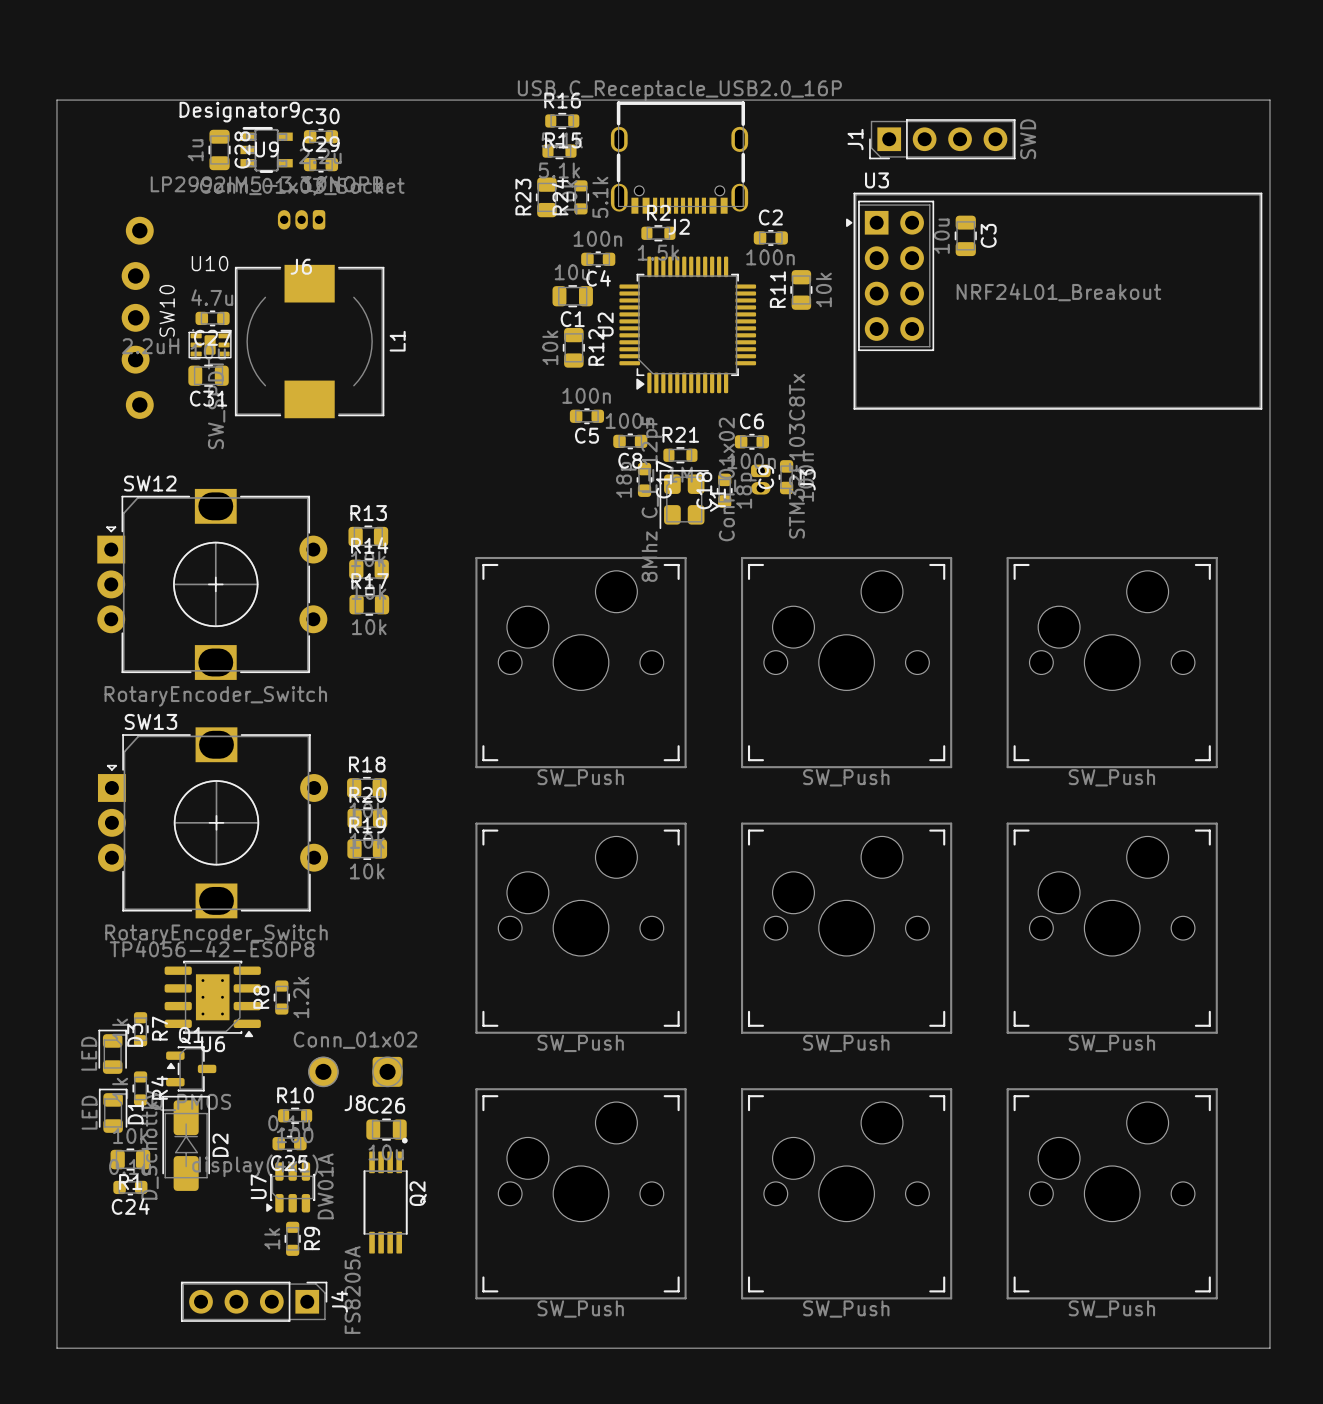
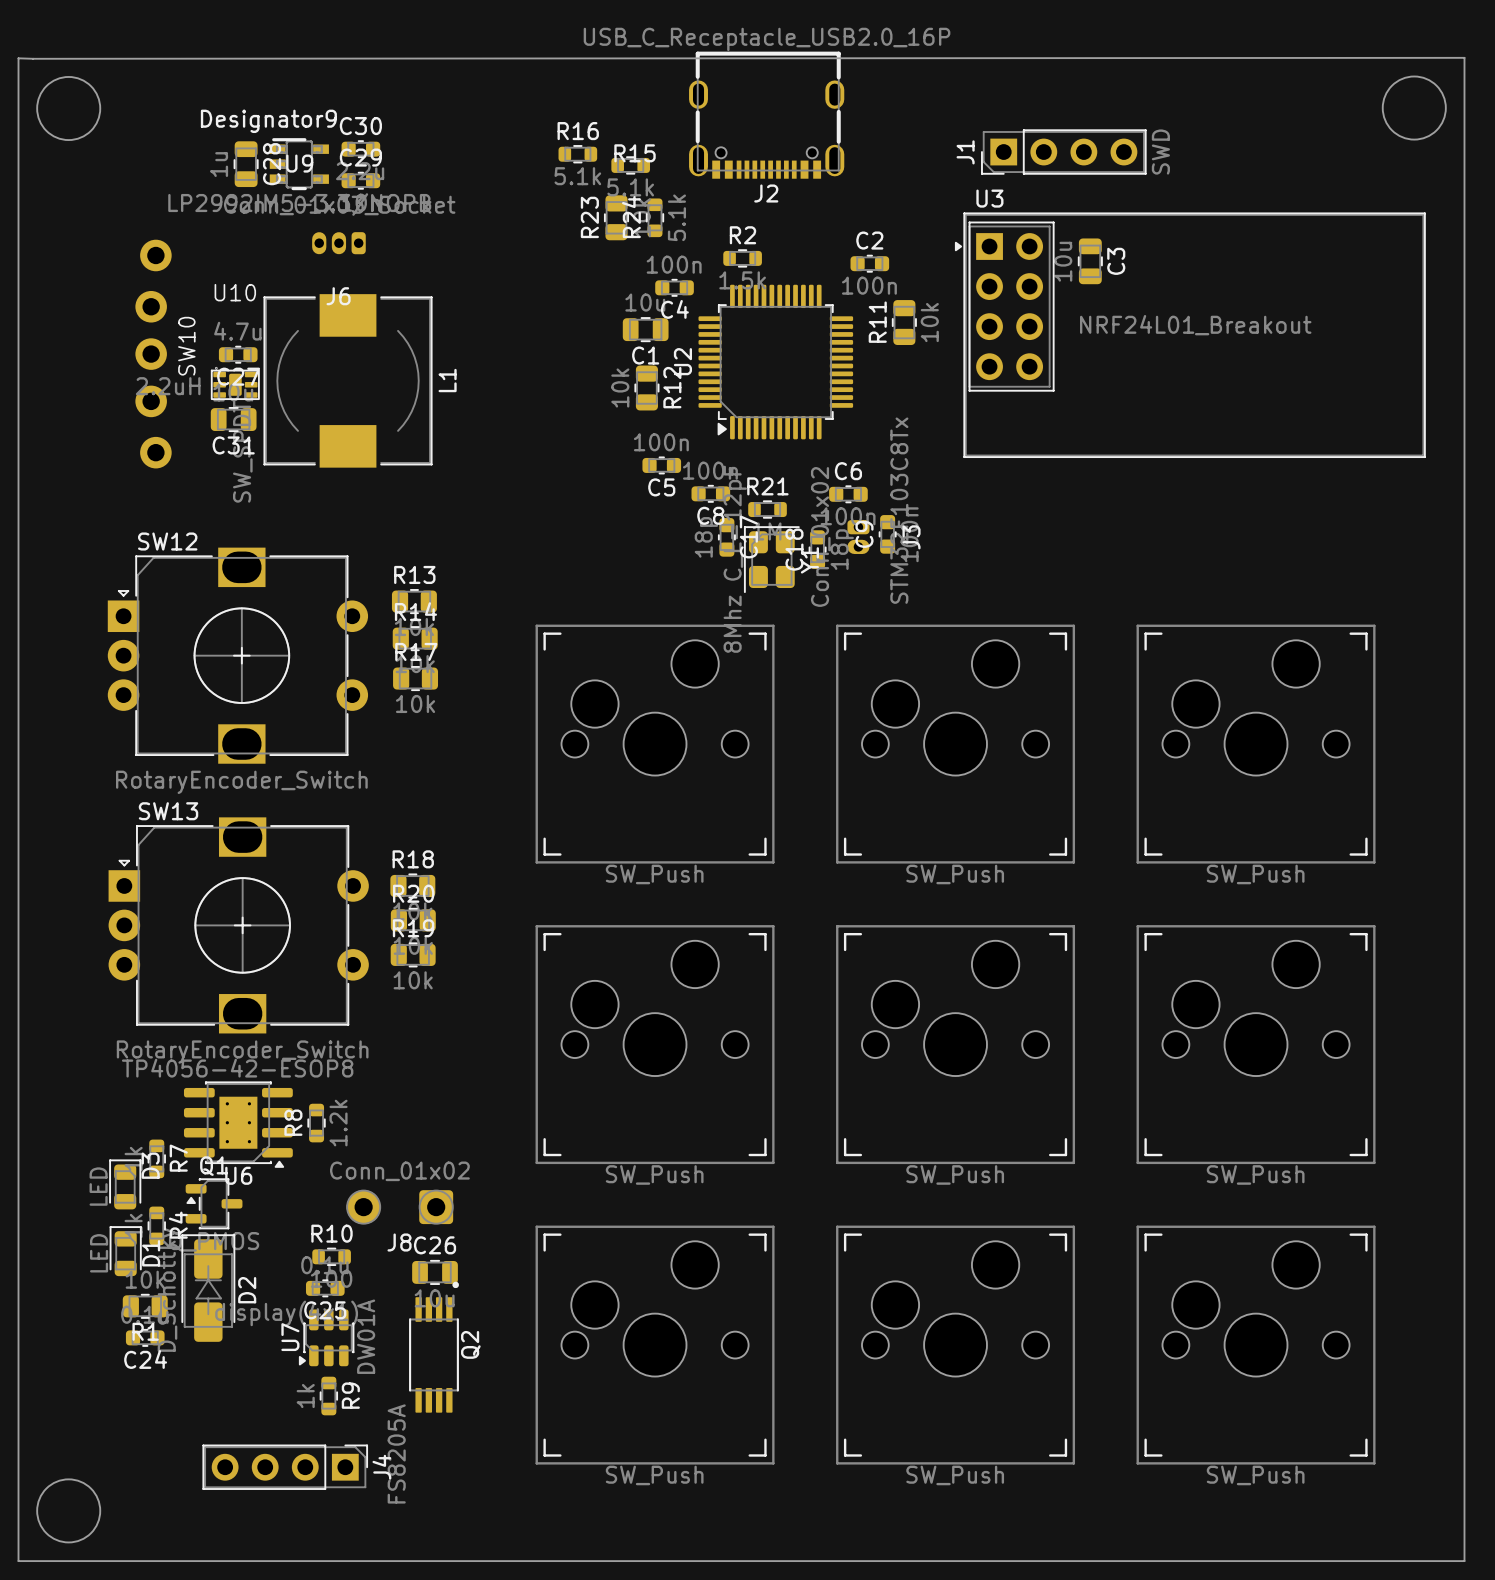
round board edge: none -> [36, 76, 101, 141]
round board edge: none -> [1382, 76, 1447, 140]
board edge: (56, 100) (1269, 100) (1269, 1348) (56, 1348) (56, 100) -> (1464, 57) (18, 58) (18, 1561) (1464, 1561) (1464, 57)
J2 footprint: [610, 101, 749, 214] -> [689, 51, 845, 179]
R16 position: (562, 120) -> (577, 154)
round board edge: none -> [36, 1478, 101, 1543]

